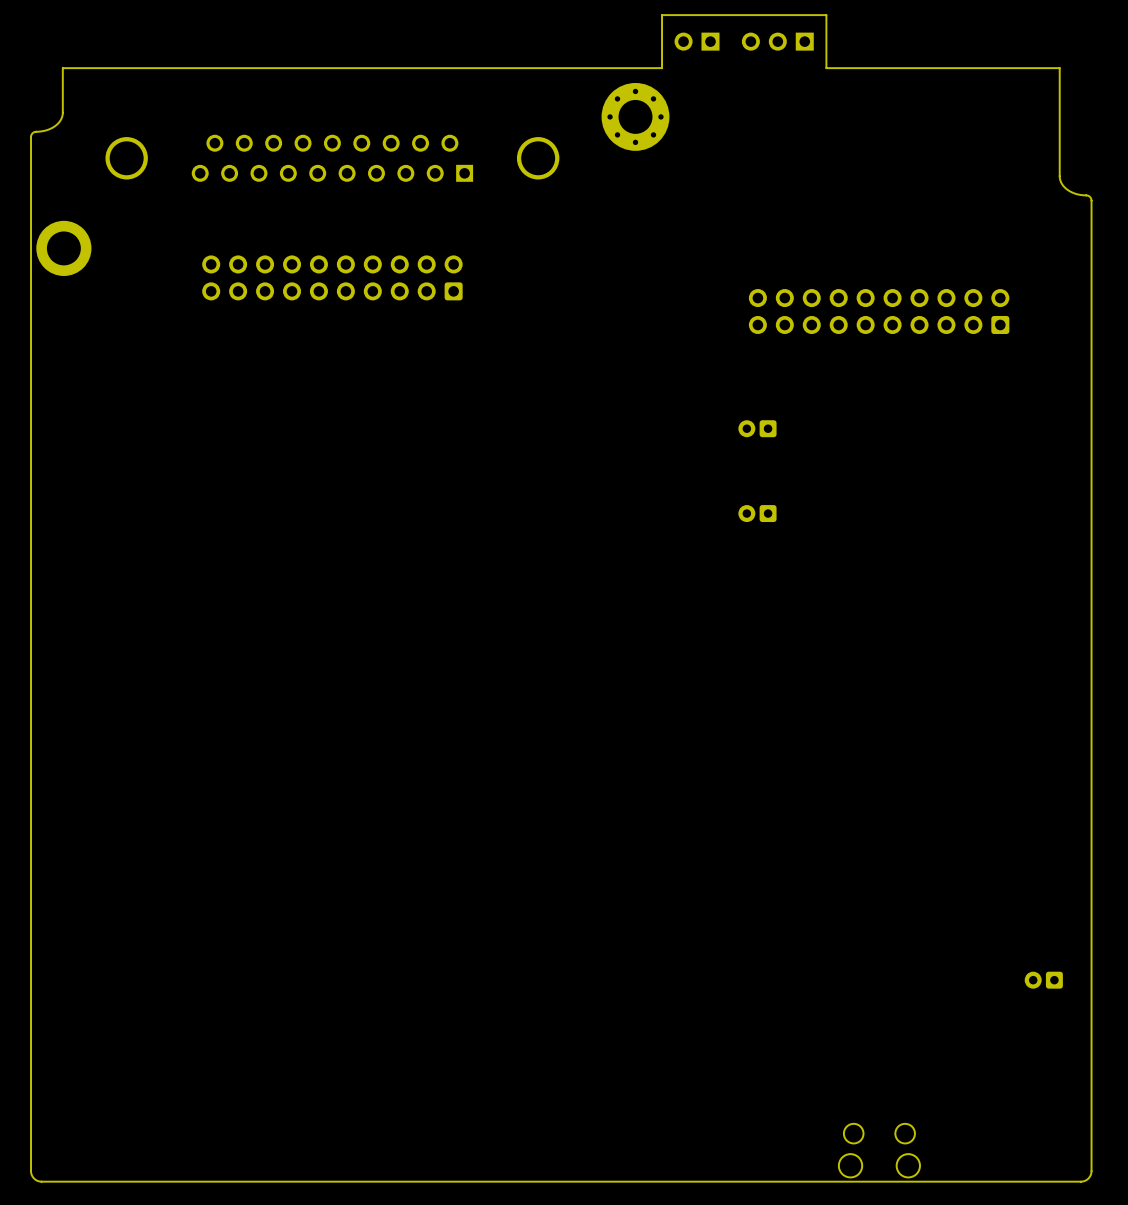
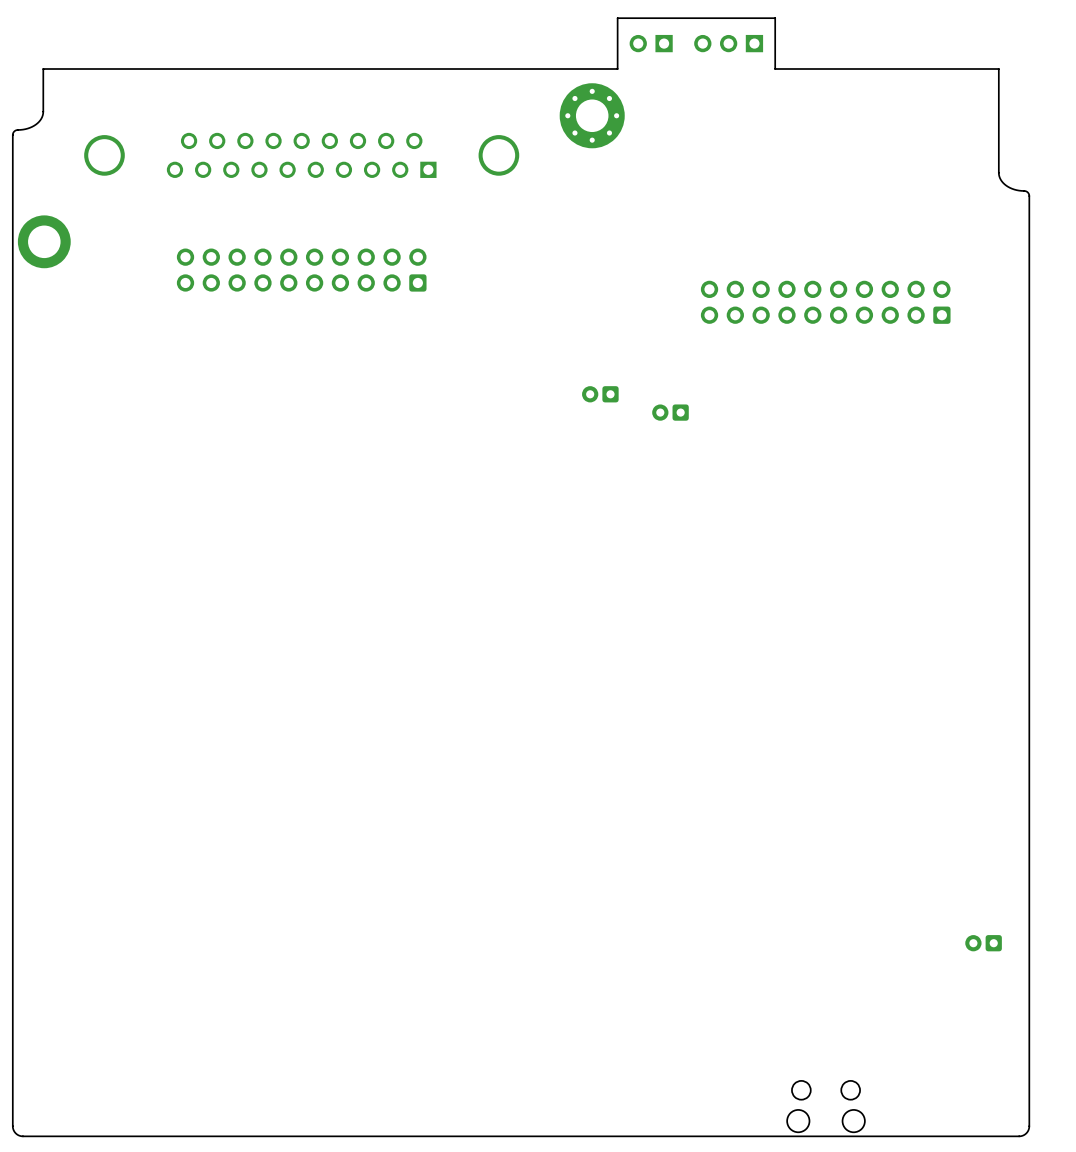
part: none -> (600, 394)
part position: (757, 428) -> (670, 412)
part: (757, 513) -> none

